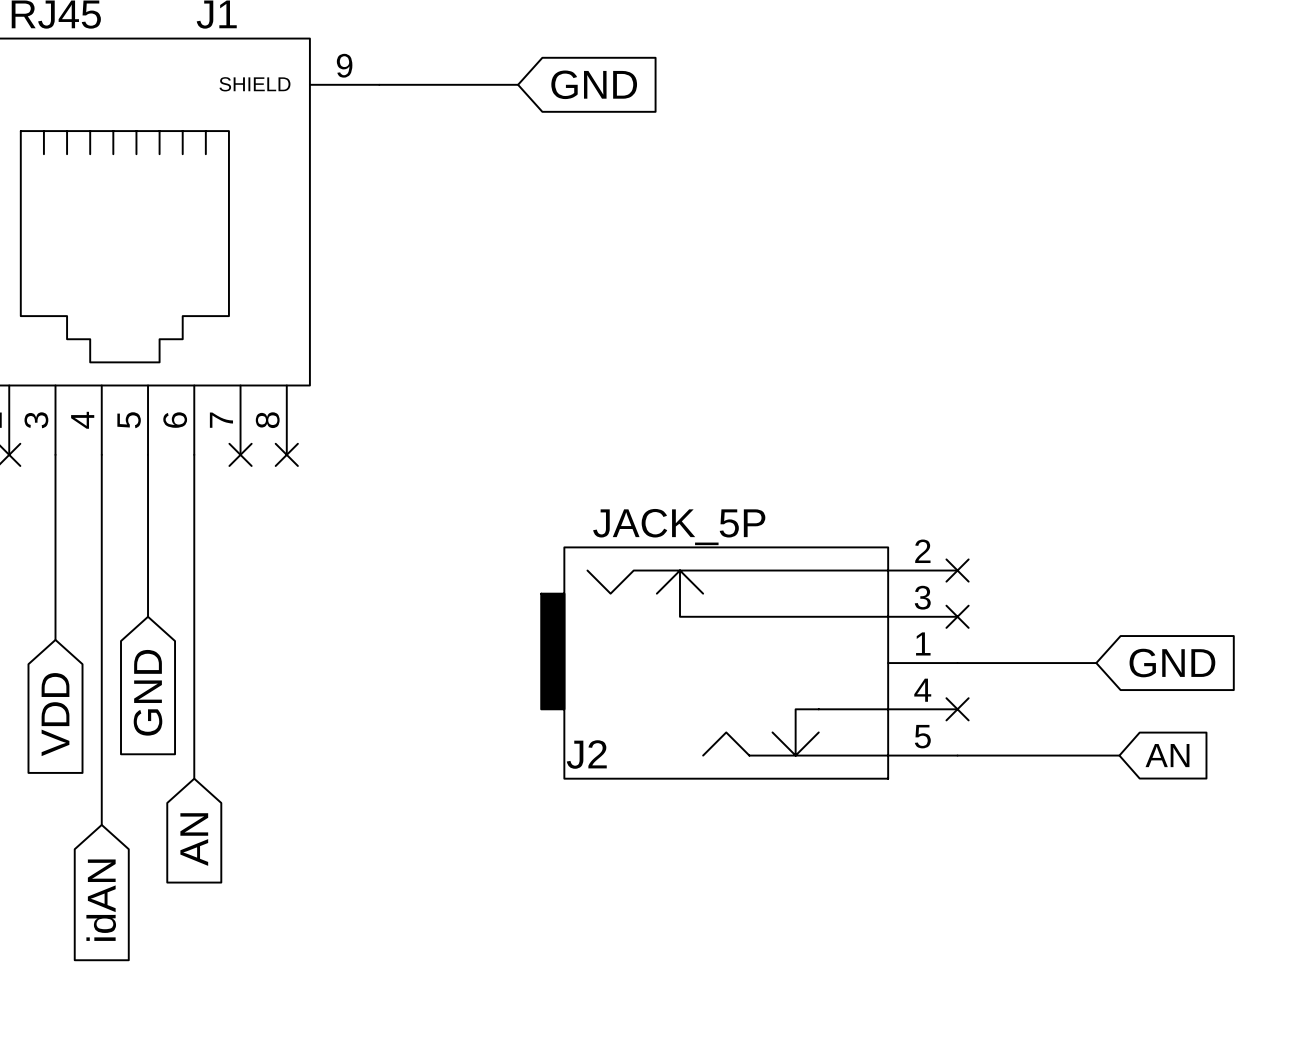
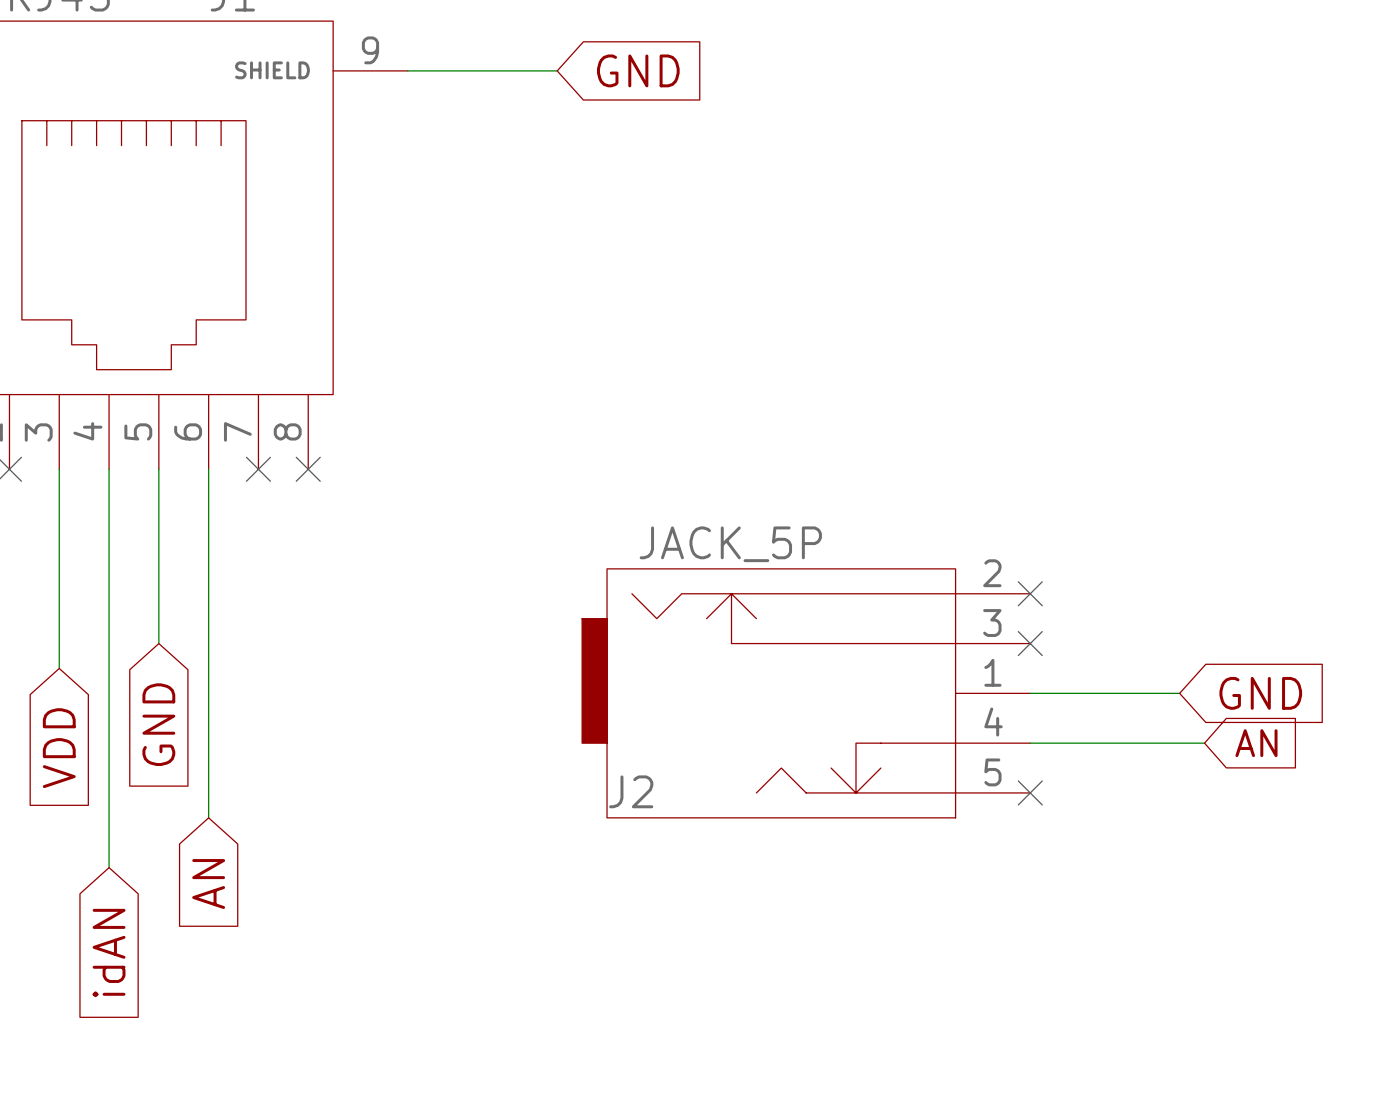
no-connect mark position: (957, 709) -> (1030, 792)
wire: (957, 755) (1119, 755) -> (1030, 743) (1204, 743)
global label position: AN (1167, 755) -> AN (1256, 743)

